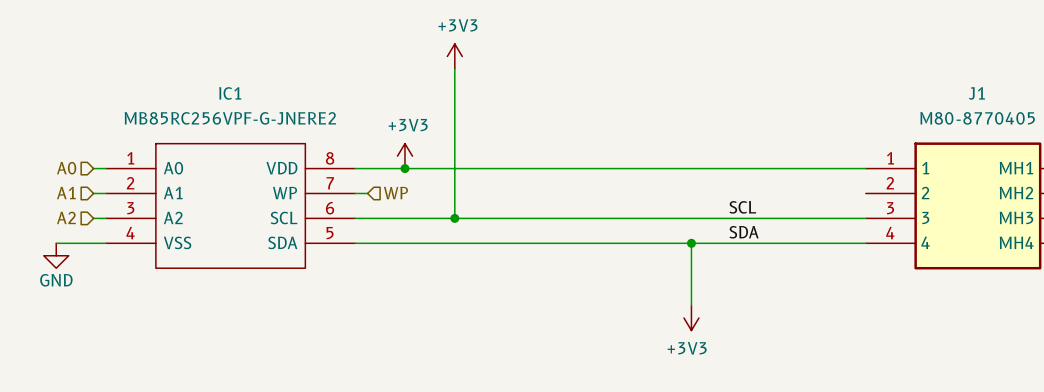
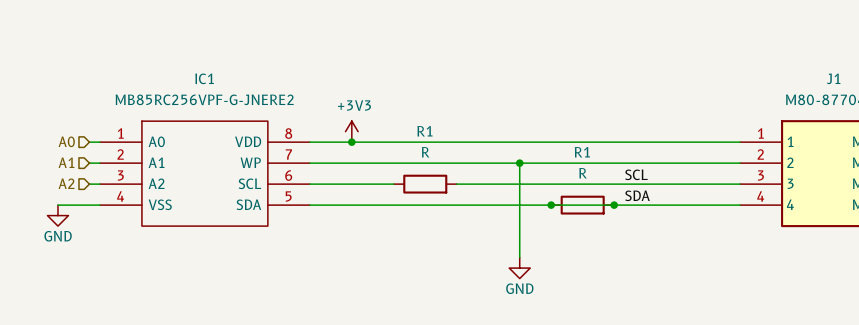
power symbol: +3V3 (454, 56) -> none
wire: (454, 68) (454, 218) (529, 218) -> none
wire: none -> (320, 163) (740, 163)
hierarchical label: WP (395, 193) -> none
wire: none -> (519, 163) (519, 257)
junction: none -> (519, 163)
junction: (454, 218) -> none
R1: none -> R (425, 184)
junction: none -> (551, 205)
R1: none -> R (582, 205)
wire: (691, 243) (691, 305) -> none
junction: (691, 243) -> none
junction: none -> (614, 205)
power symbol: none -> GND (519, 268)
power symbol: +3V3 (691, 318) -> none

